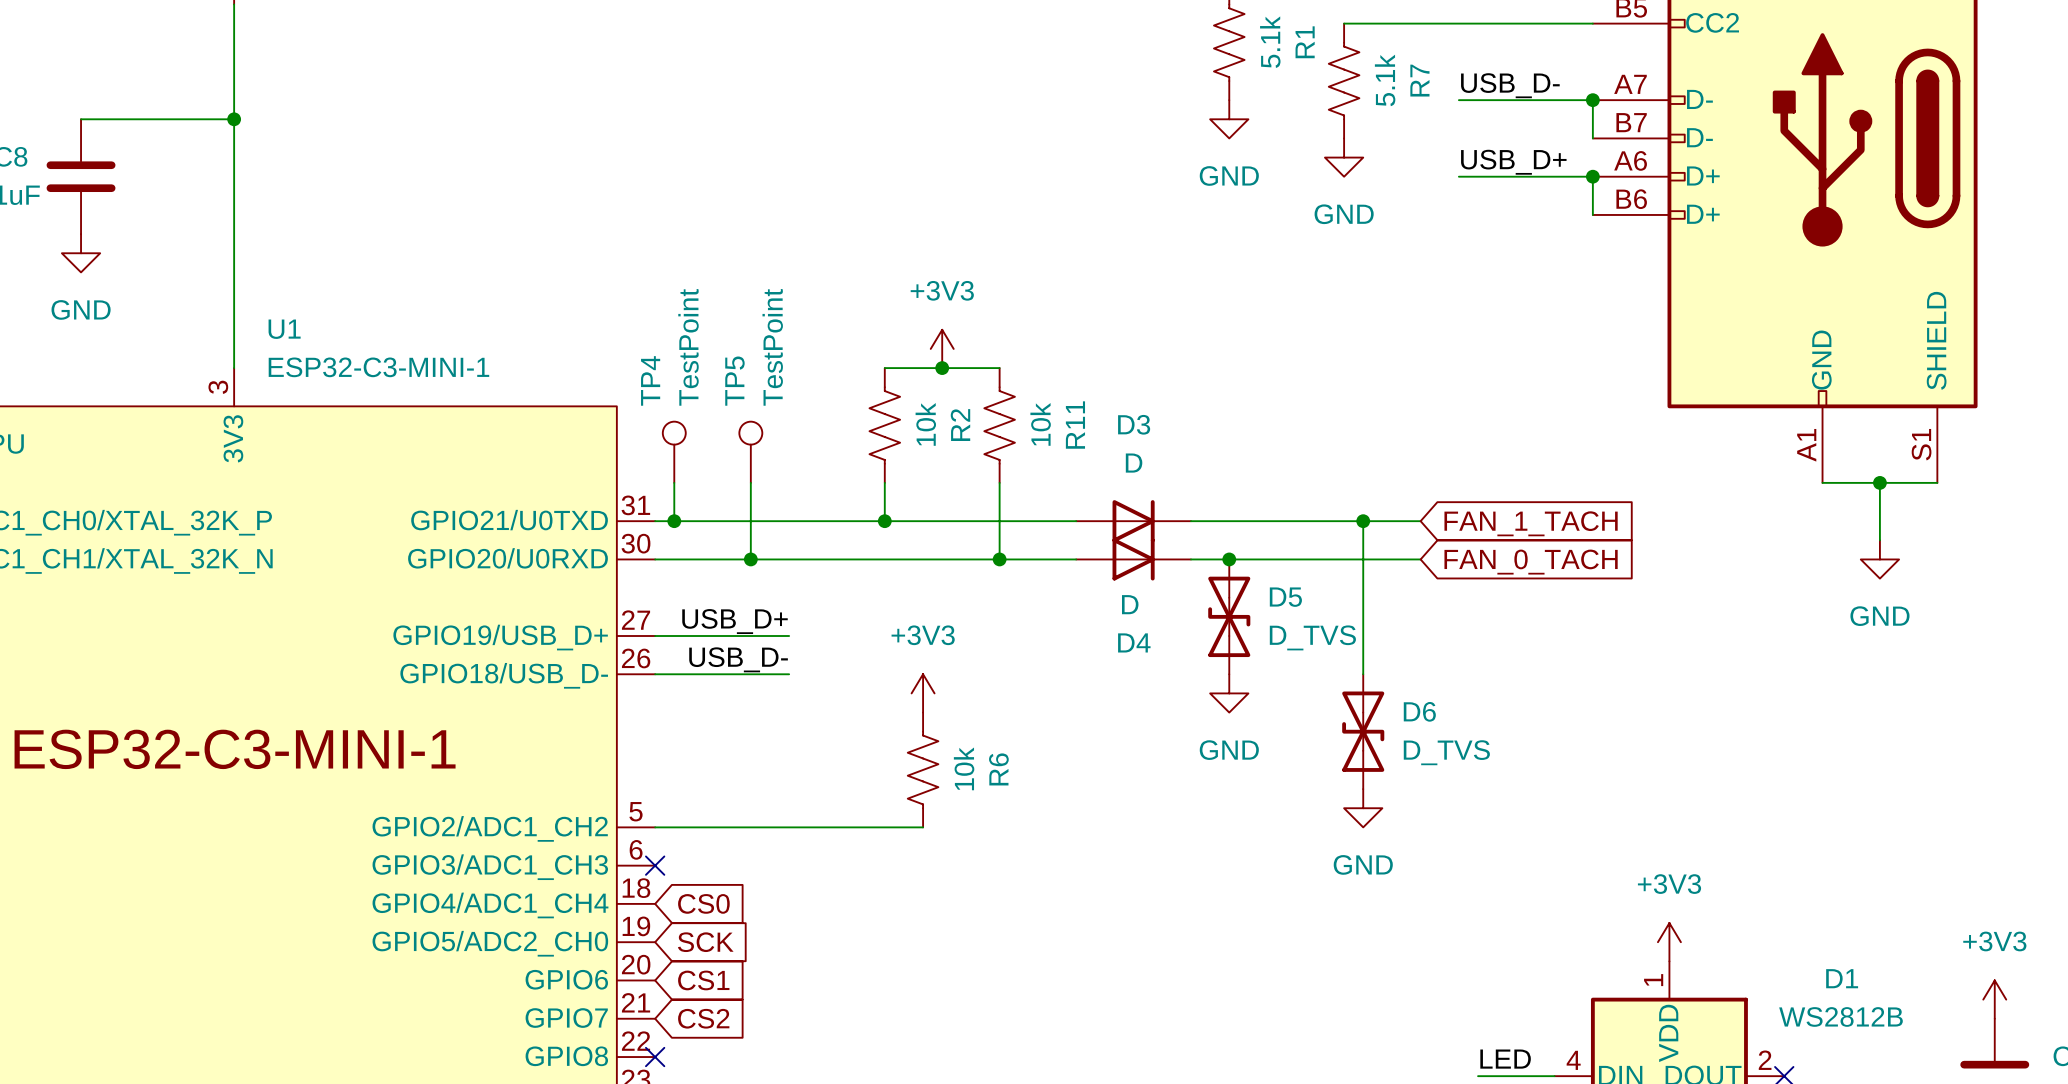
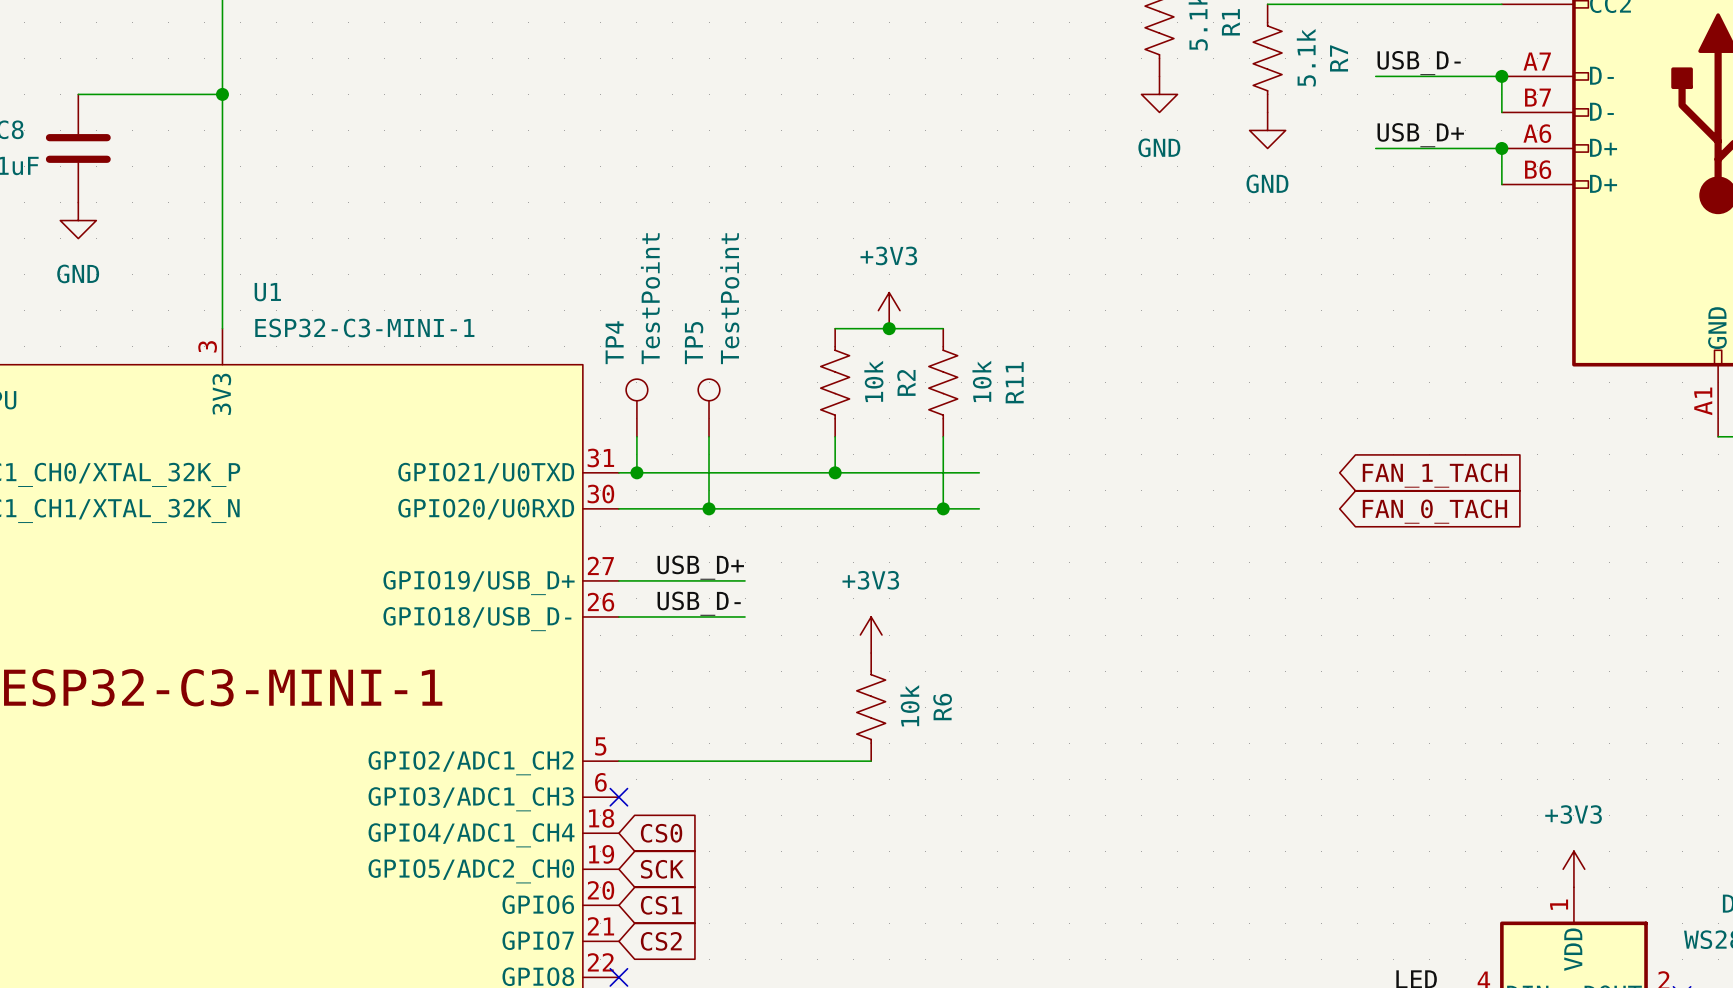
wire: (1037, 521) (1076, 521) -> none
D3: D (1133, 521) -> none
wire: (1190, 521) (1420, 521) -> none
wire: (1363, 521) (1363, 674) -> none
junction: (1363, 521) -> none
wire: (1037, 559) (1076, 559) -> none
D4: D (1133, 559) -> none
wire: (1190, 559) (1420, 559) -> none
junction: (1229, 559) -> none
D5: D_TVS (1229, 616) -> none
power symbol: GND (1229, 693) -> none
D6: D_TVS (1363, 731) -> none
power symbol: GND (1363, 808) -> none

